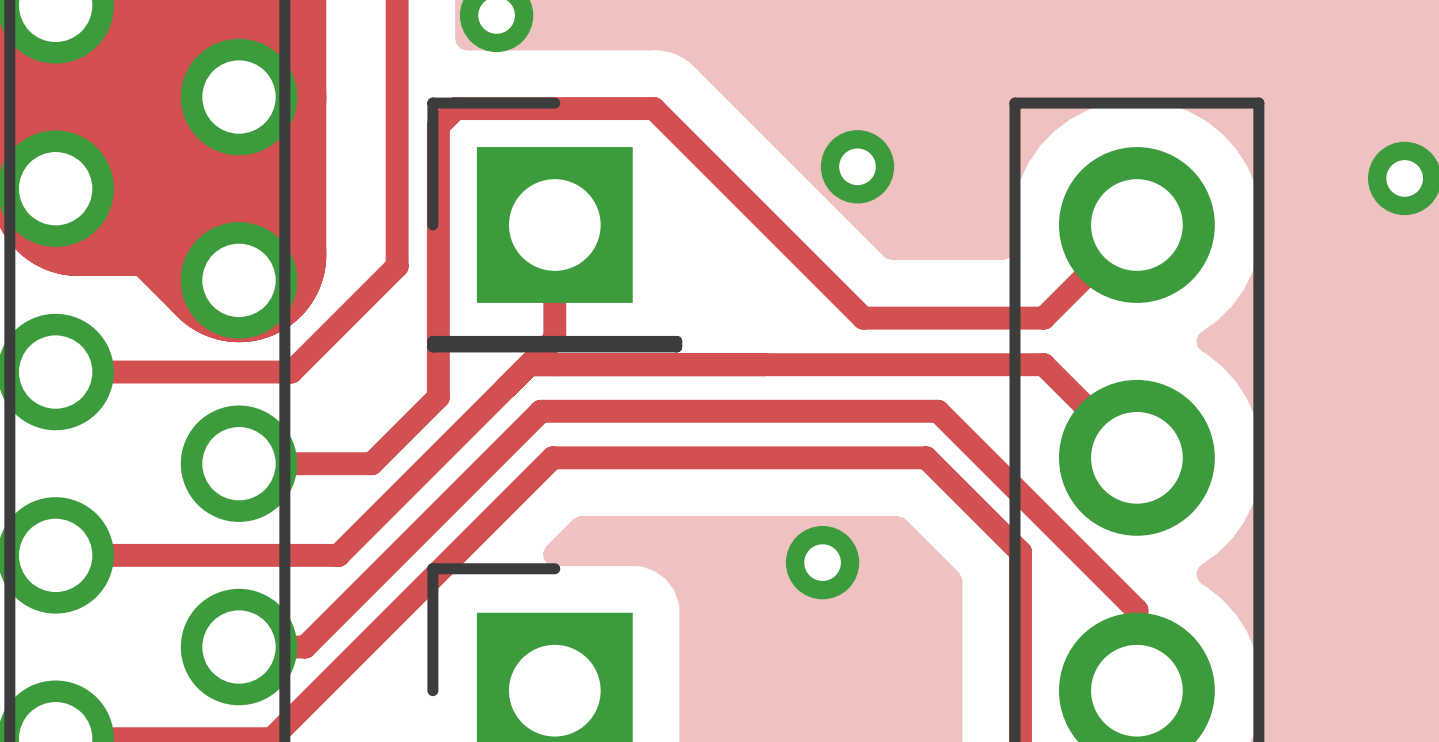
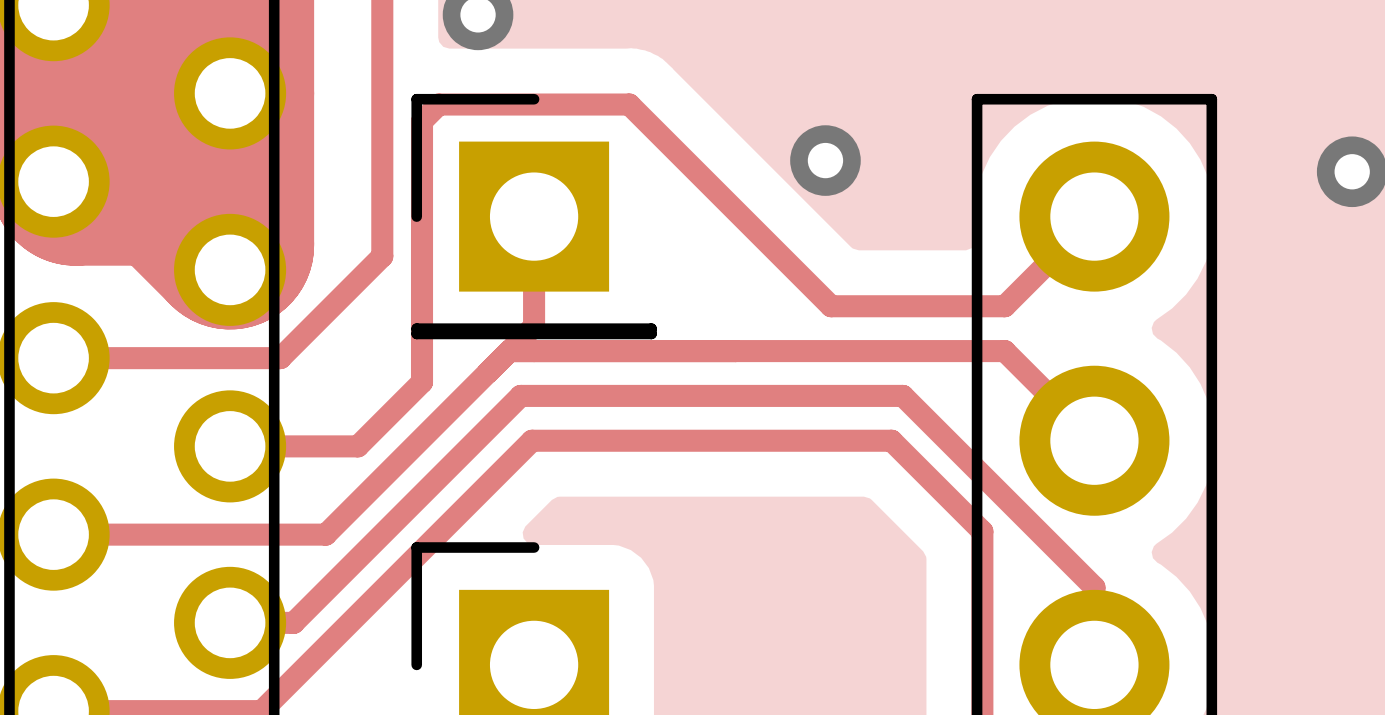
via: (822, 562) -> none

